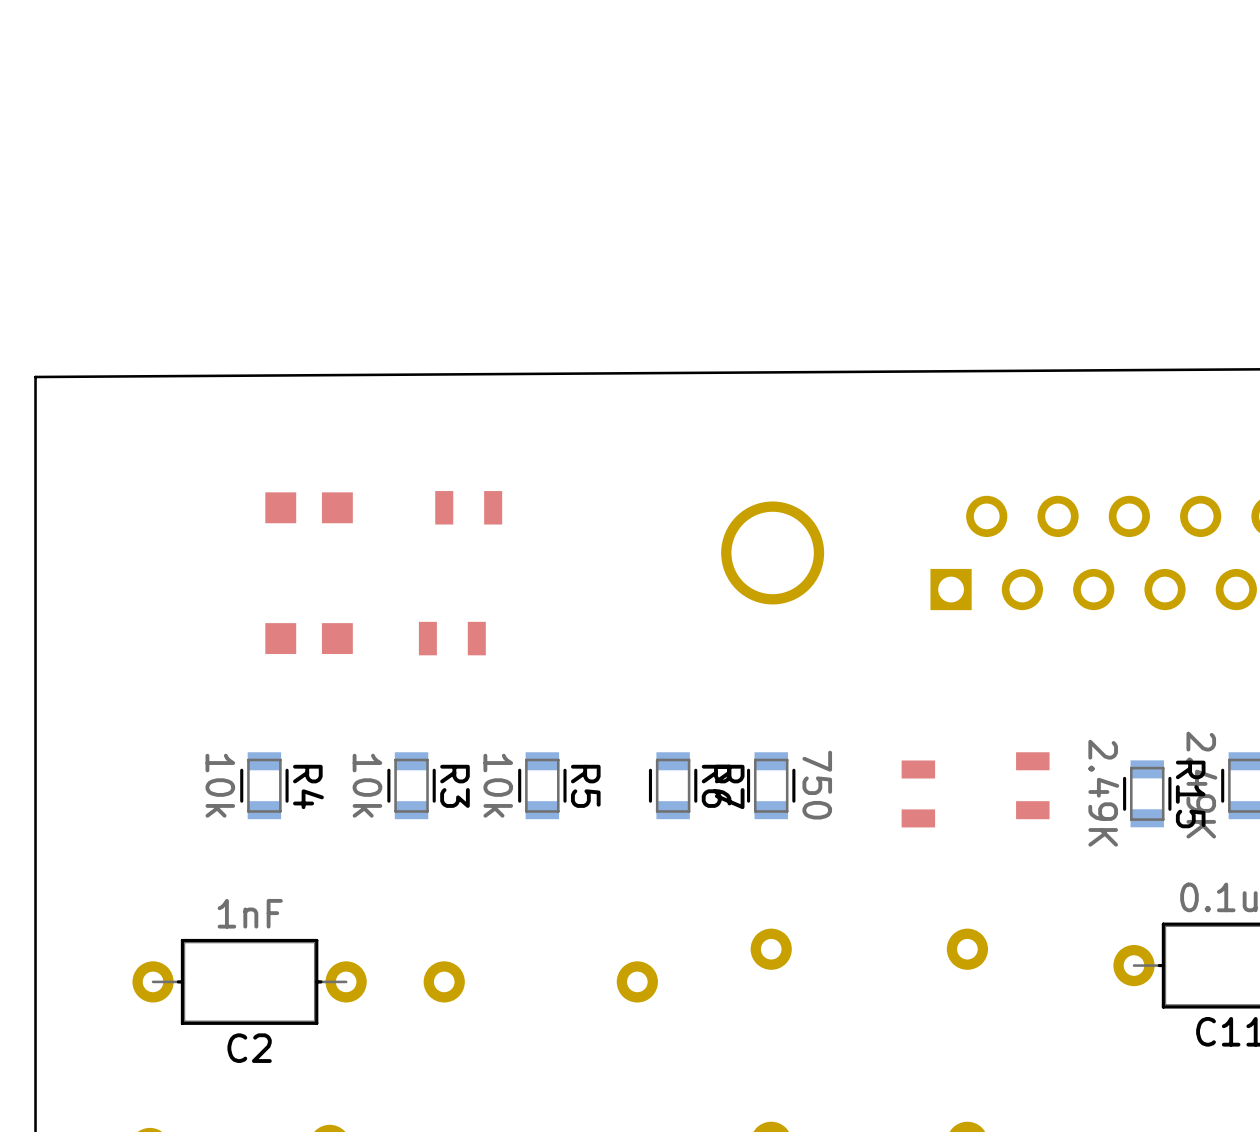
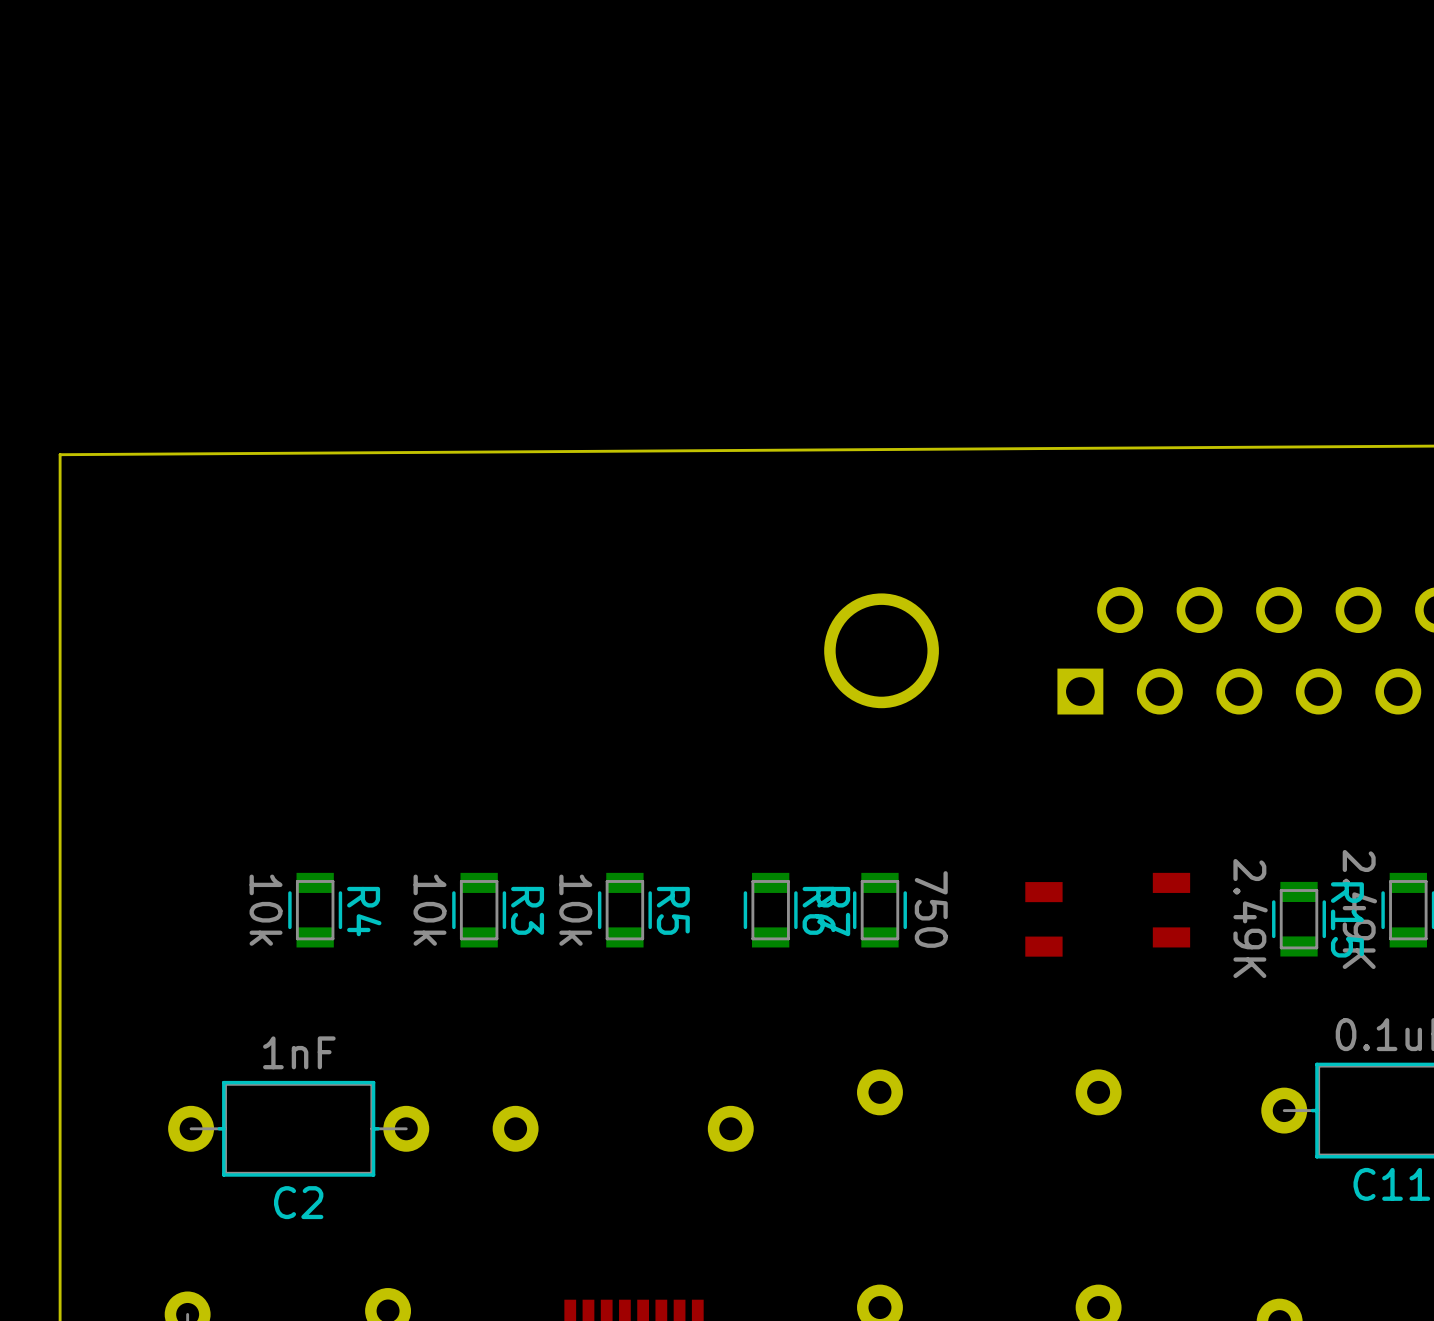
part: (309, 507) -> none
part: (468, 507) -> none
part: (309, 638) -> none
part: (452, 638) -> none

